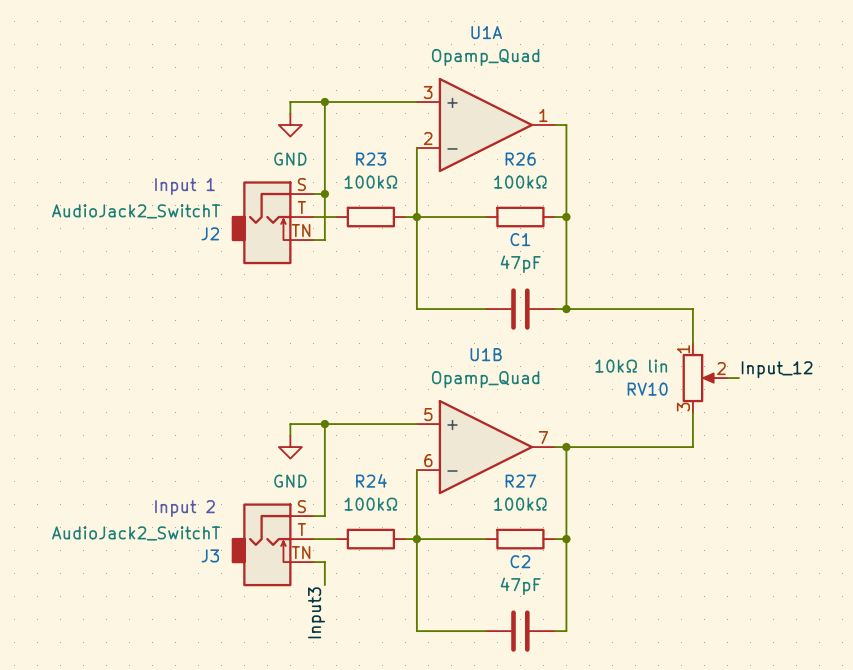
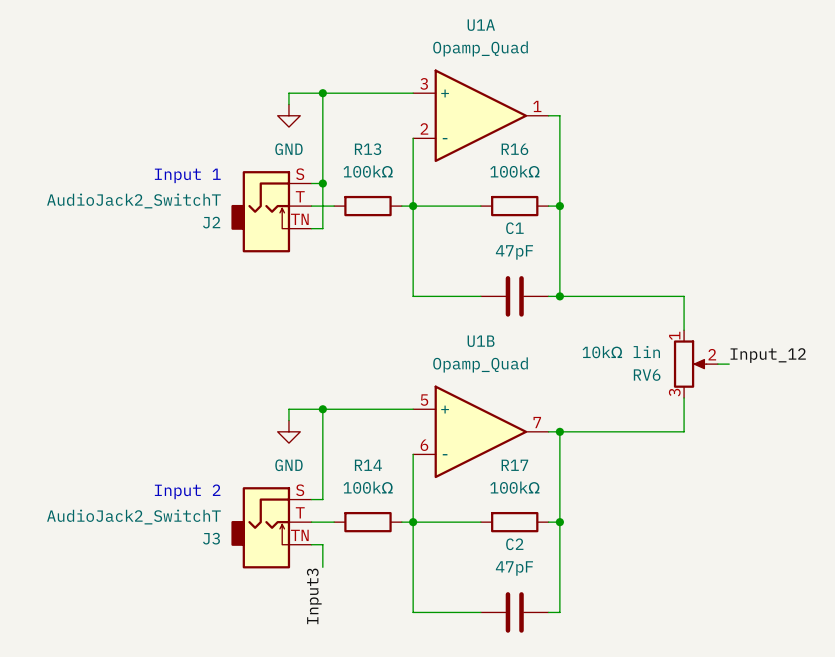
R23 name: R23 (371, 159) -> R13 (368, 149)
R26 name: R26 (520, 159) -> R16 (514, 149)
RV10 name: RV10 (647, 389) -> RV6 (647, 375)
R24 name: R24 (371, 480) -> R14 (368, 465)
R27 name: R27 (520, 481) -> R17 (514, 465)

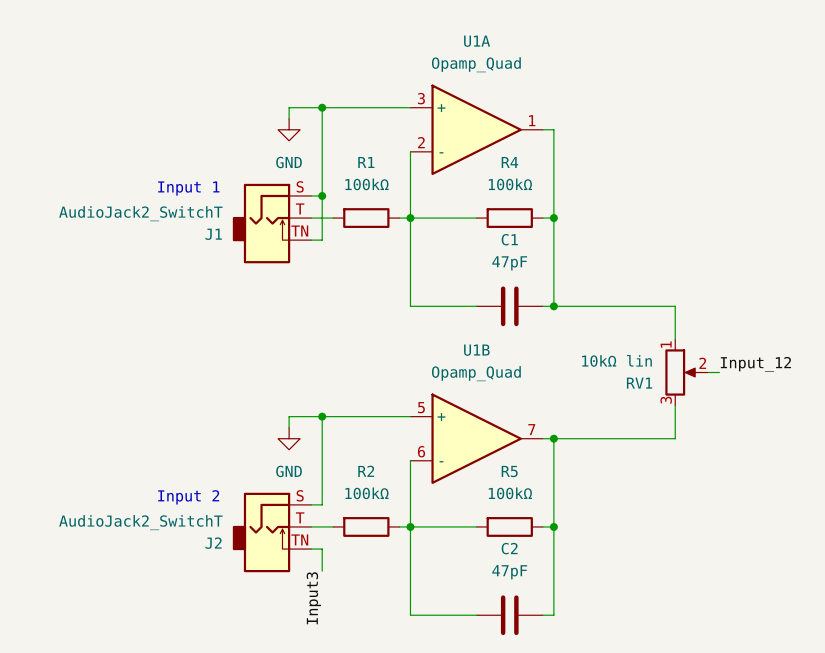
R13 name: R13 (368, 149) -> R1 (366, 162)
R16 name: R16 (514, 149) -> R4 (509, 162)
J2 name: J2 (211, 222) -> J1 (213, 234)
RV6 name: RV6 (647, 375) -> RV1 (639, 383)
R14 name: R14 (368, 465) -> R2 (366, 471)
R17 name: R17 (514, 465) -> R5 (509, 471)
J3 name: J3 (211, 538) -> J2 (213, 543)

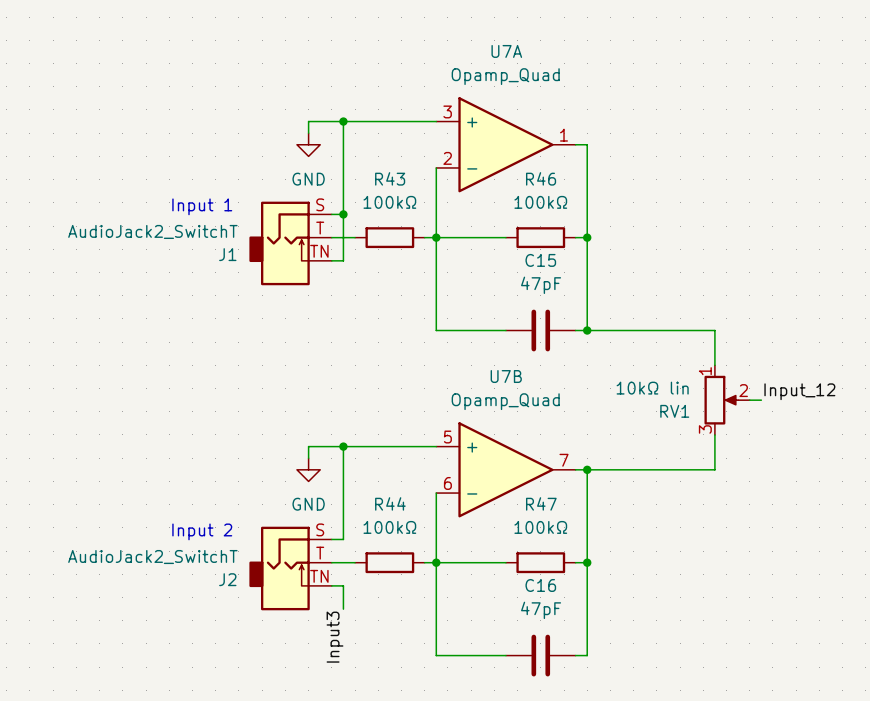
U1A name: U1A (477, 41) -> U7A (506, 51)
R1 name: R1 (366, 162) -> R43 (390, 178)
R4 name: R4 (509, 162) -> R46 (541, 178)
C1 name: C1 (509, 239) -> C15 (540, 260)
U1B name: U1B (476, 350) -> U7B (506, 376)
R2 name: R2 (366, 471) -> R44 (390, 503)
R5 name: R5 (509, 471) -> R47 (541, 503)
C2 name: C2 (509, 548) -> C16 (540, 585)

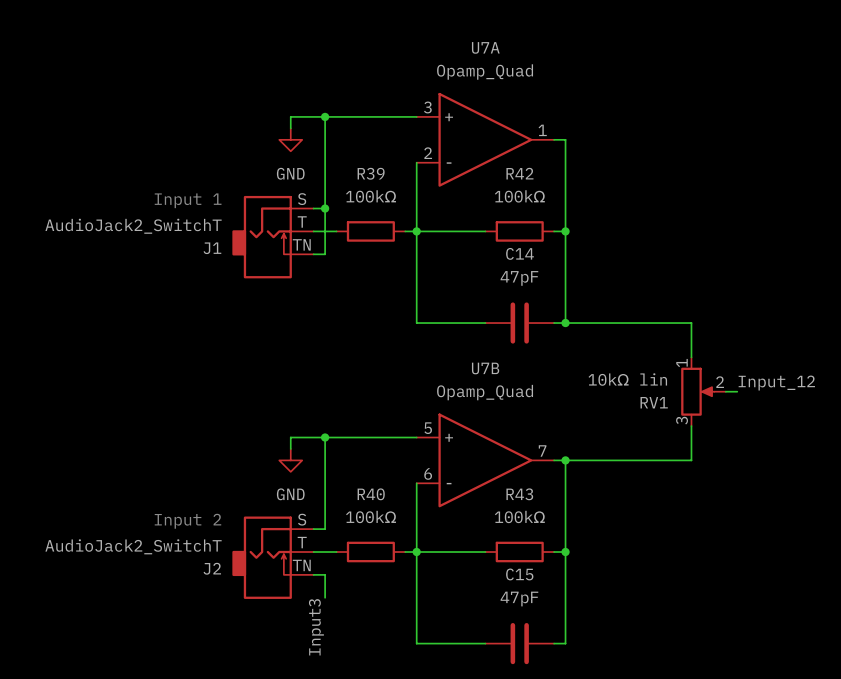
R43 name: R43 (390, 178) -> R39 (371, 173)
R46 name: R46 (541, 178) -> R42 (519, 173)
C15 name: C15 (540, 260) -> C14 (520, 253)
R44 name: R44 (390, 503) -> R40 (371, 494)
R47 name: R47 (541, 503) -> R43 (519, 494)
C16 name: C16 (540, 585) -> C15 (519, 574)

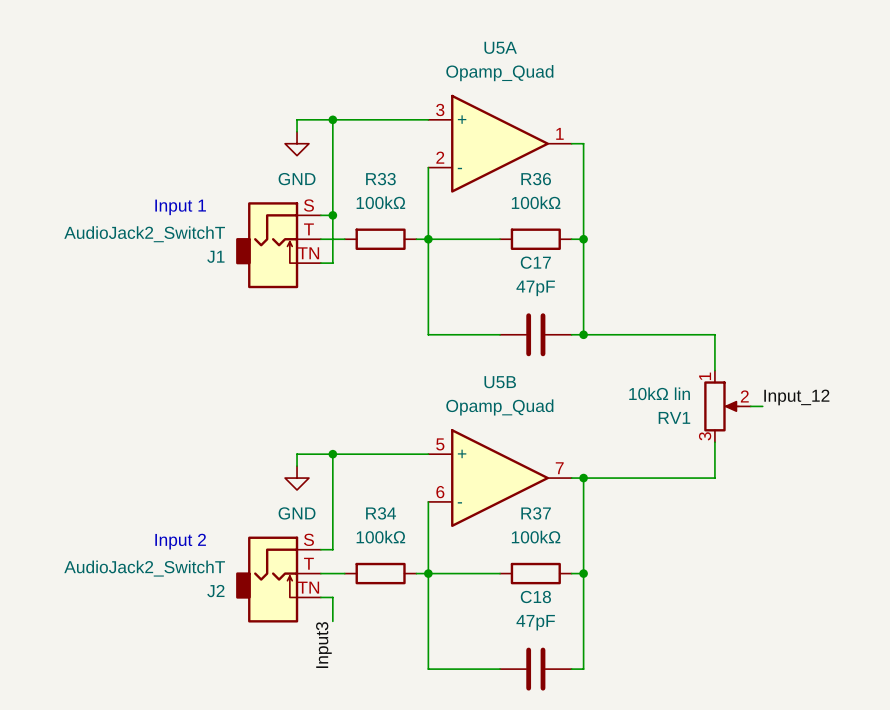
U7A name: U7A (485, 47) -> U5A (500, 47)
R39 name: R39 (371, 173) -> R33 (380, 179)
R42 name: R42 (519, 173) -> R36 (536, 179)
C14 name: C14 (520, 253) -> C17 (535, 262)
U7B name: U7B (485, 368) -> U5B (500, 382)
R40 name: R40 (371, 494) -> R34 (381, 513)
R43 name: R43 (519, 494) -> R37 (536, 513)
C15 name: C15 (519, 574) -> C18 (535, 597)

